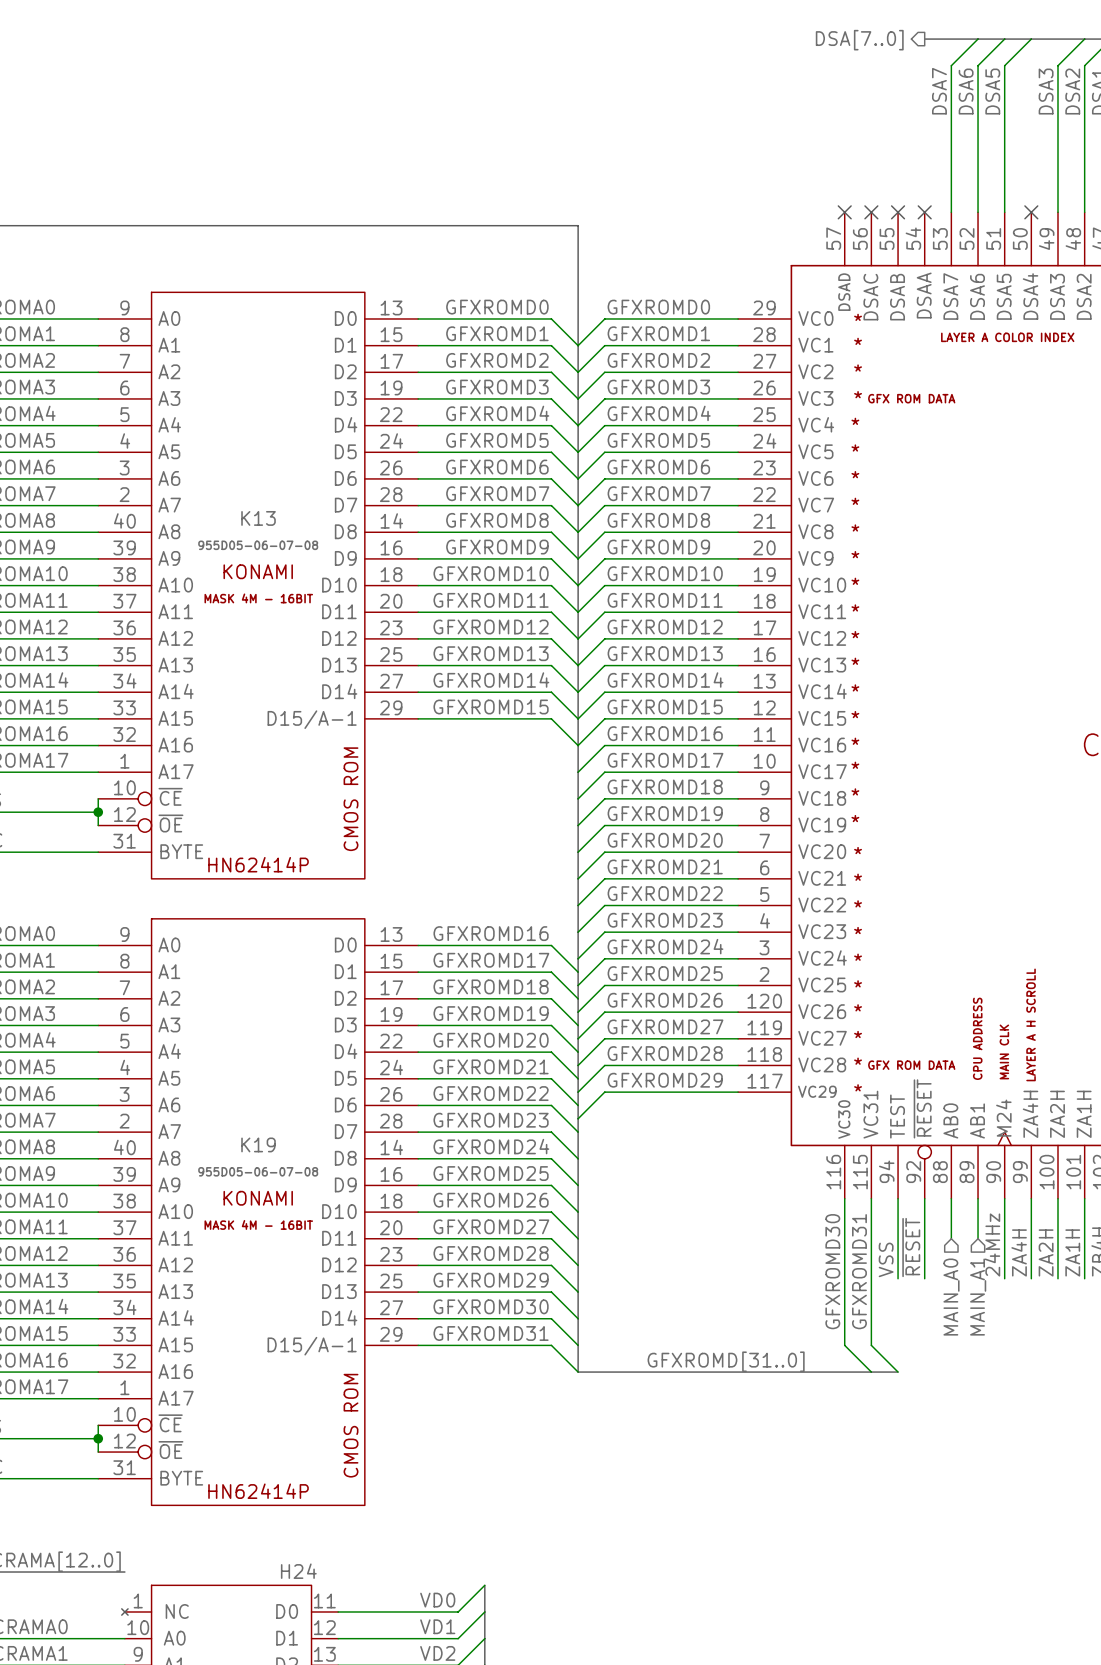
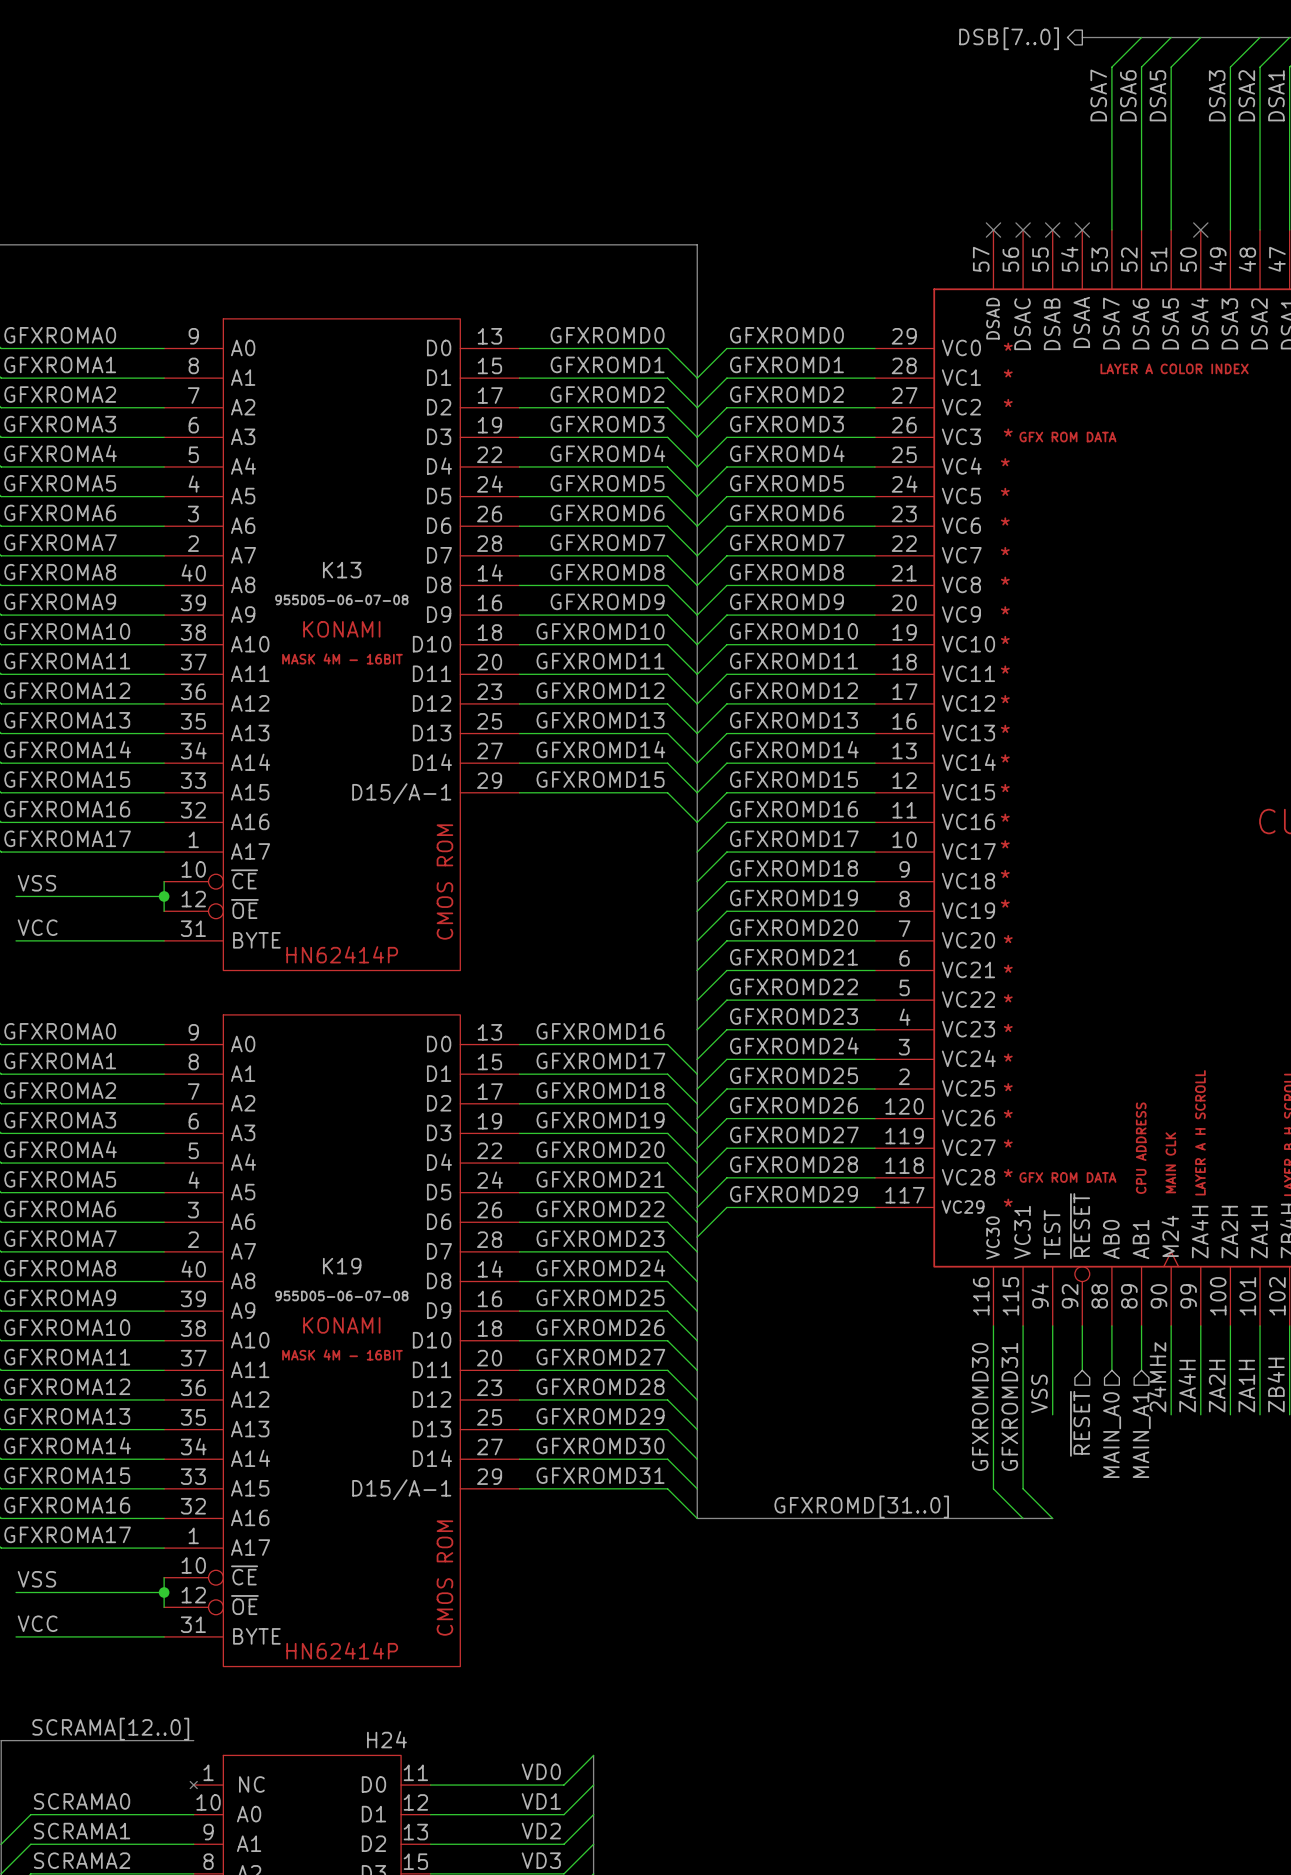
hierarchical label: DSA[7..0] (859, 40) -> DSB[7..0] (1009, 38)
wire: (924, 1238) (924, 1278) -> none
label: ~{RESET} (911, 1247) -> none
hierarchical label: none -> ~{RESET} (1080, 1423)

